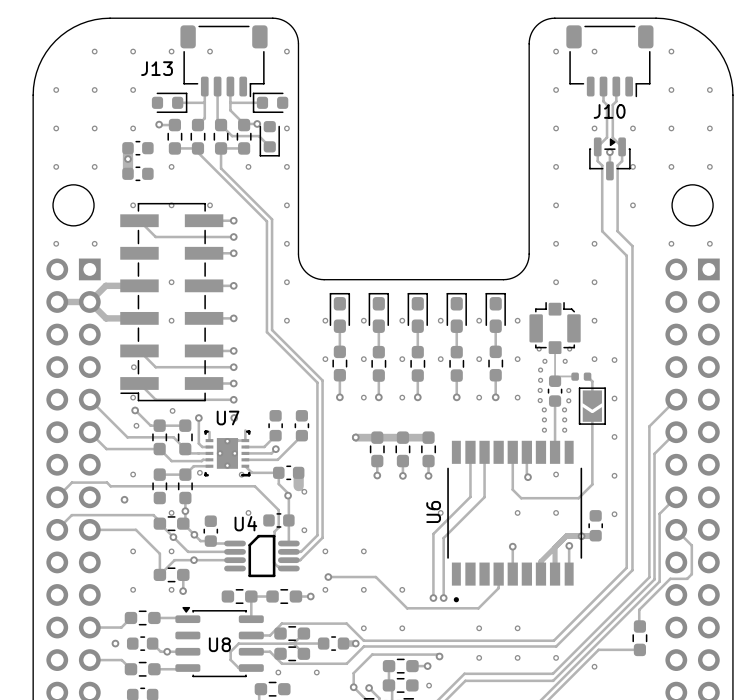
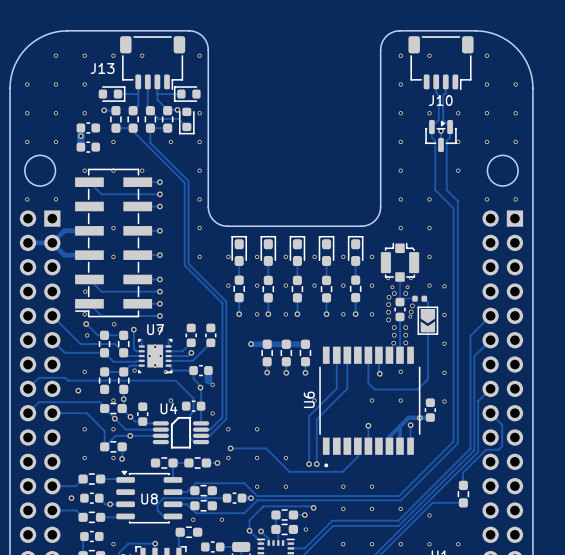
via: none -> (394, 293)
via: none -> (405, 293)
via: (540, 370) -> none
via: none -> (389, 297)
via: (540, 380) -> none
via: none -> (388, 304)
via: none -> (412, 305)
via: (540, 390) -> none
via: (568, 390) -> none
via: none -> (388, 312)
via: none -> (411, 311)
via: (540, 400) -> none
via: none -> (388, 319)
via: (544, 409) -> none
via: (564, 409) -> none
via: none -> (394, 327)
via: none -> (405, 327)
via: (544, 419) -> none
via: (564, 419) -> none
via: none -> (394, 335)
via: none -> (405, 335)
via: (544, 430) -> none
via: (564, 430) -> none
via: none -> (405, 342)
via: none -> (393, 343)

